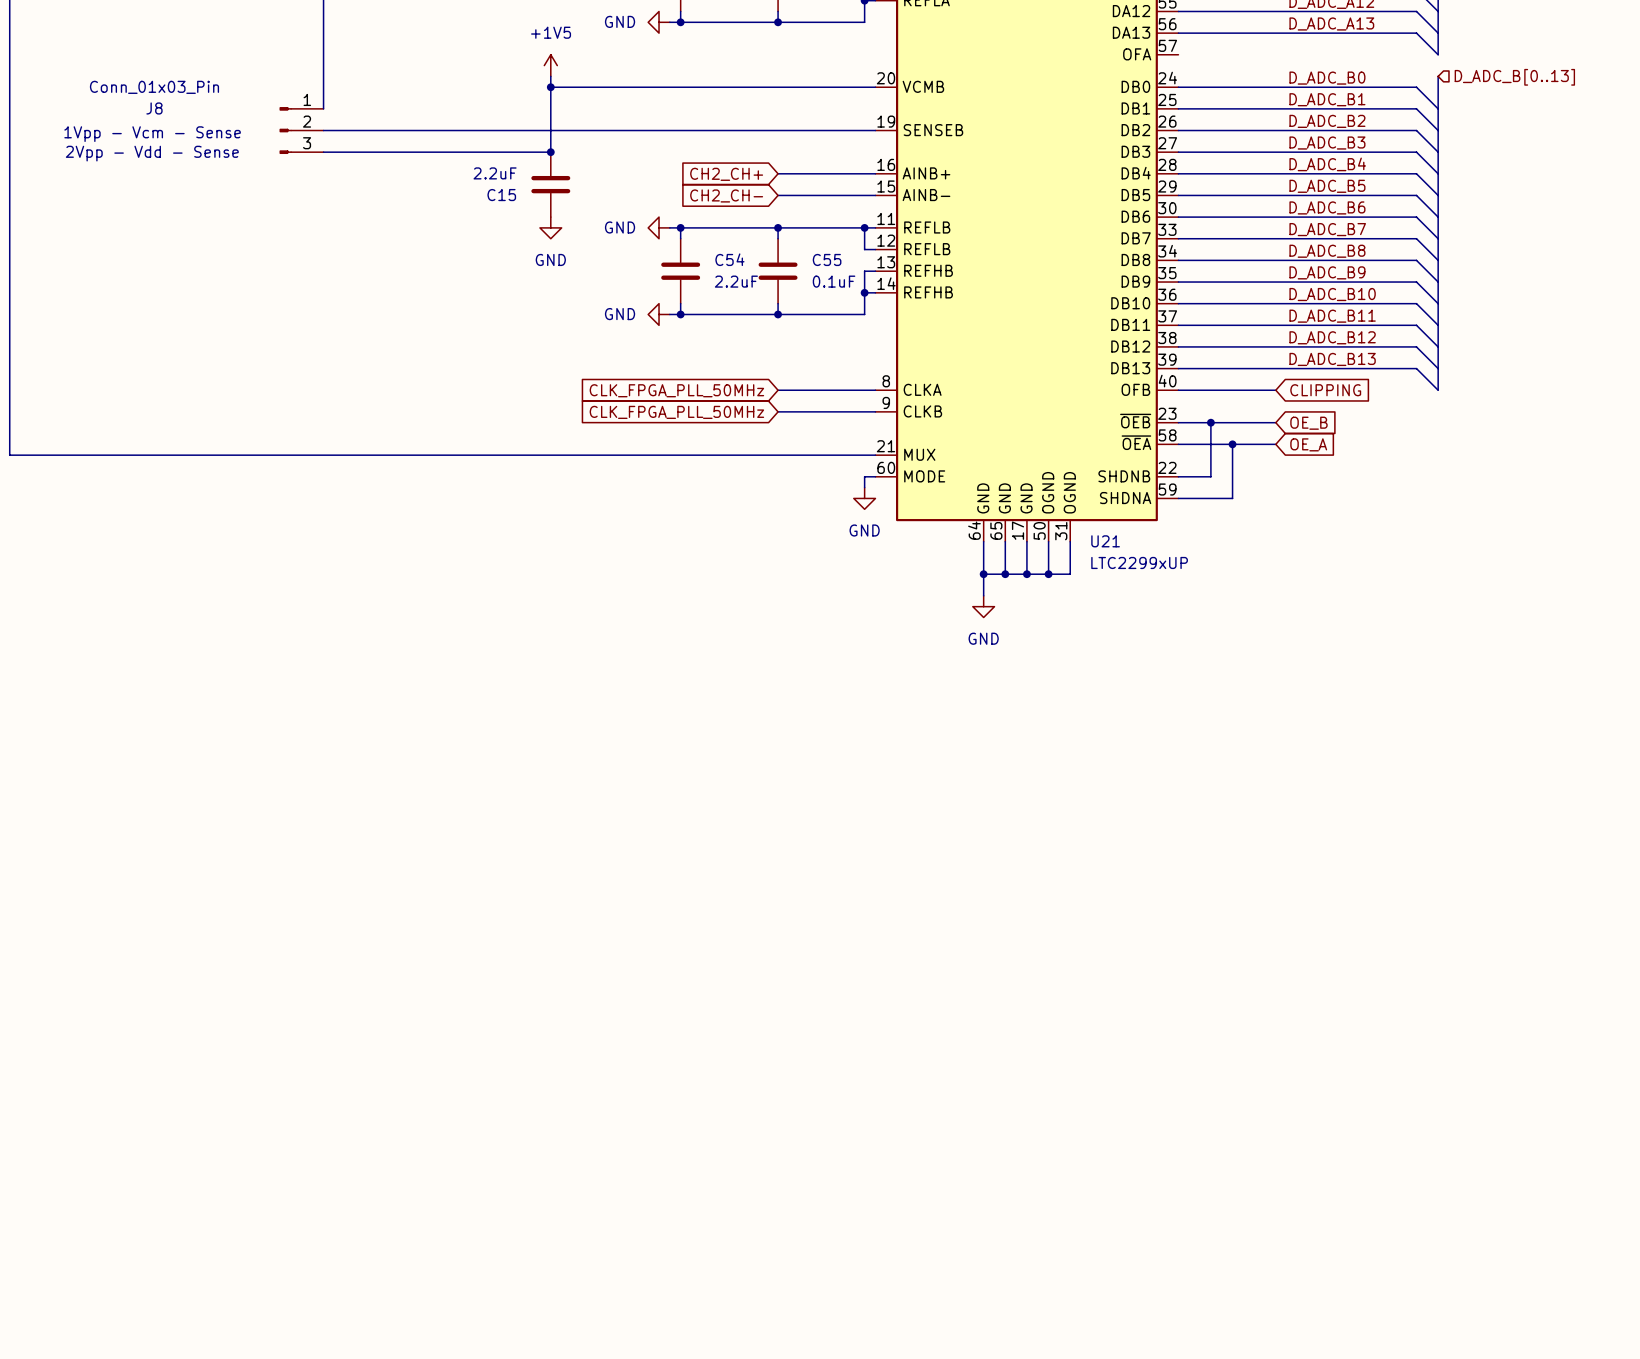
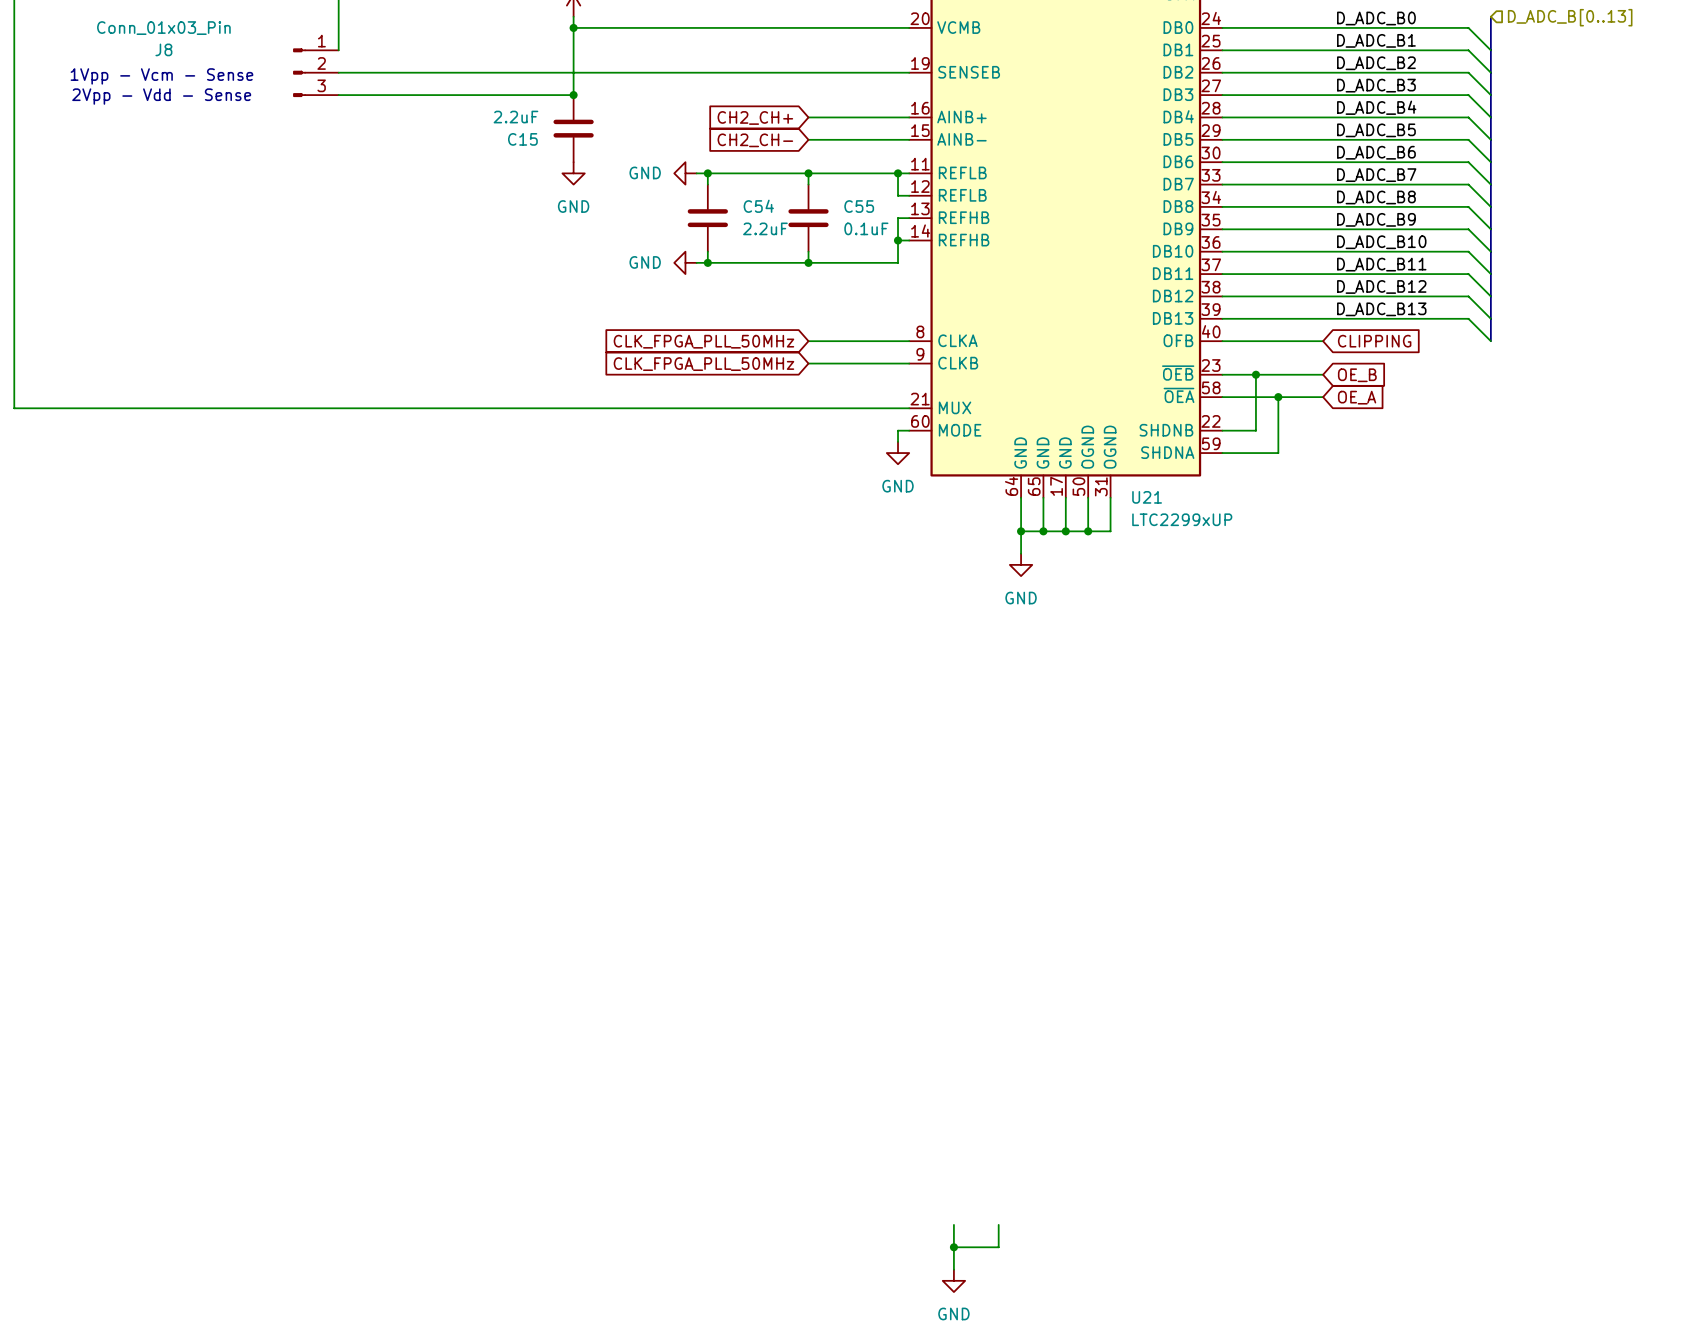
wire: none -> (953, 1224) (953, 1269)
wire: none -> (998, 1224) (998, 1247) (953, 1247)
junction: none -> (953, 1247)
power symbol: none -> GND (953, 1280)

